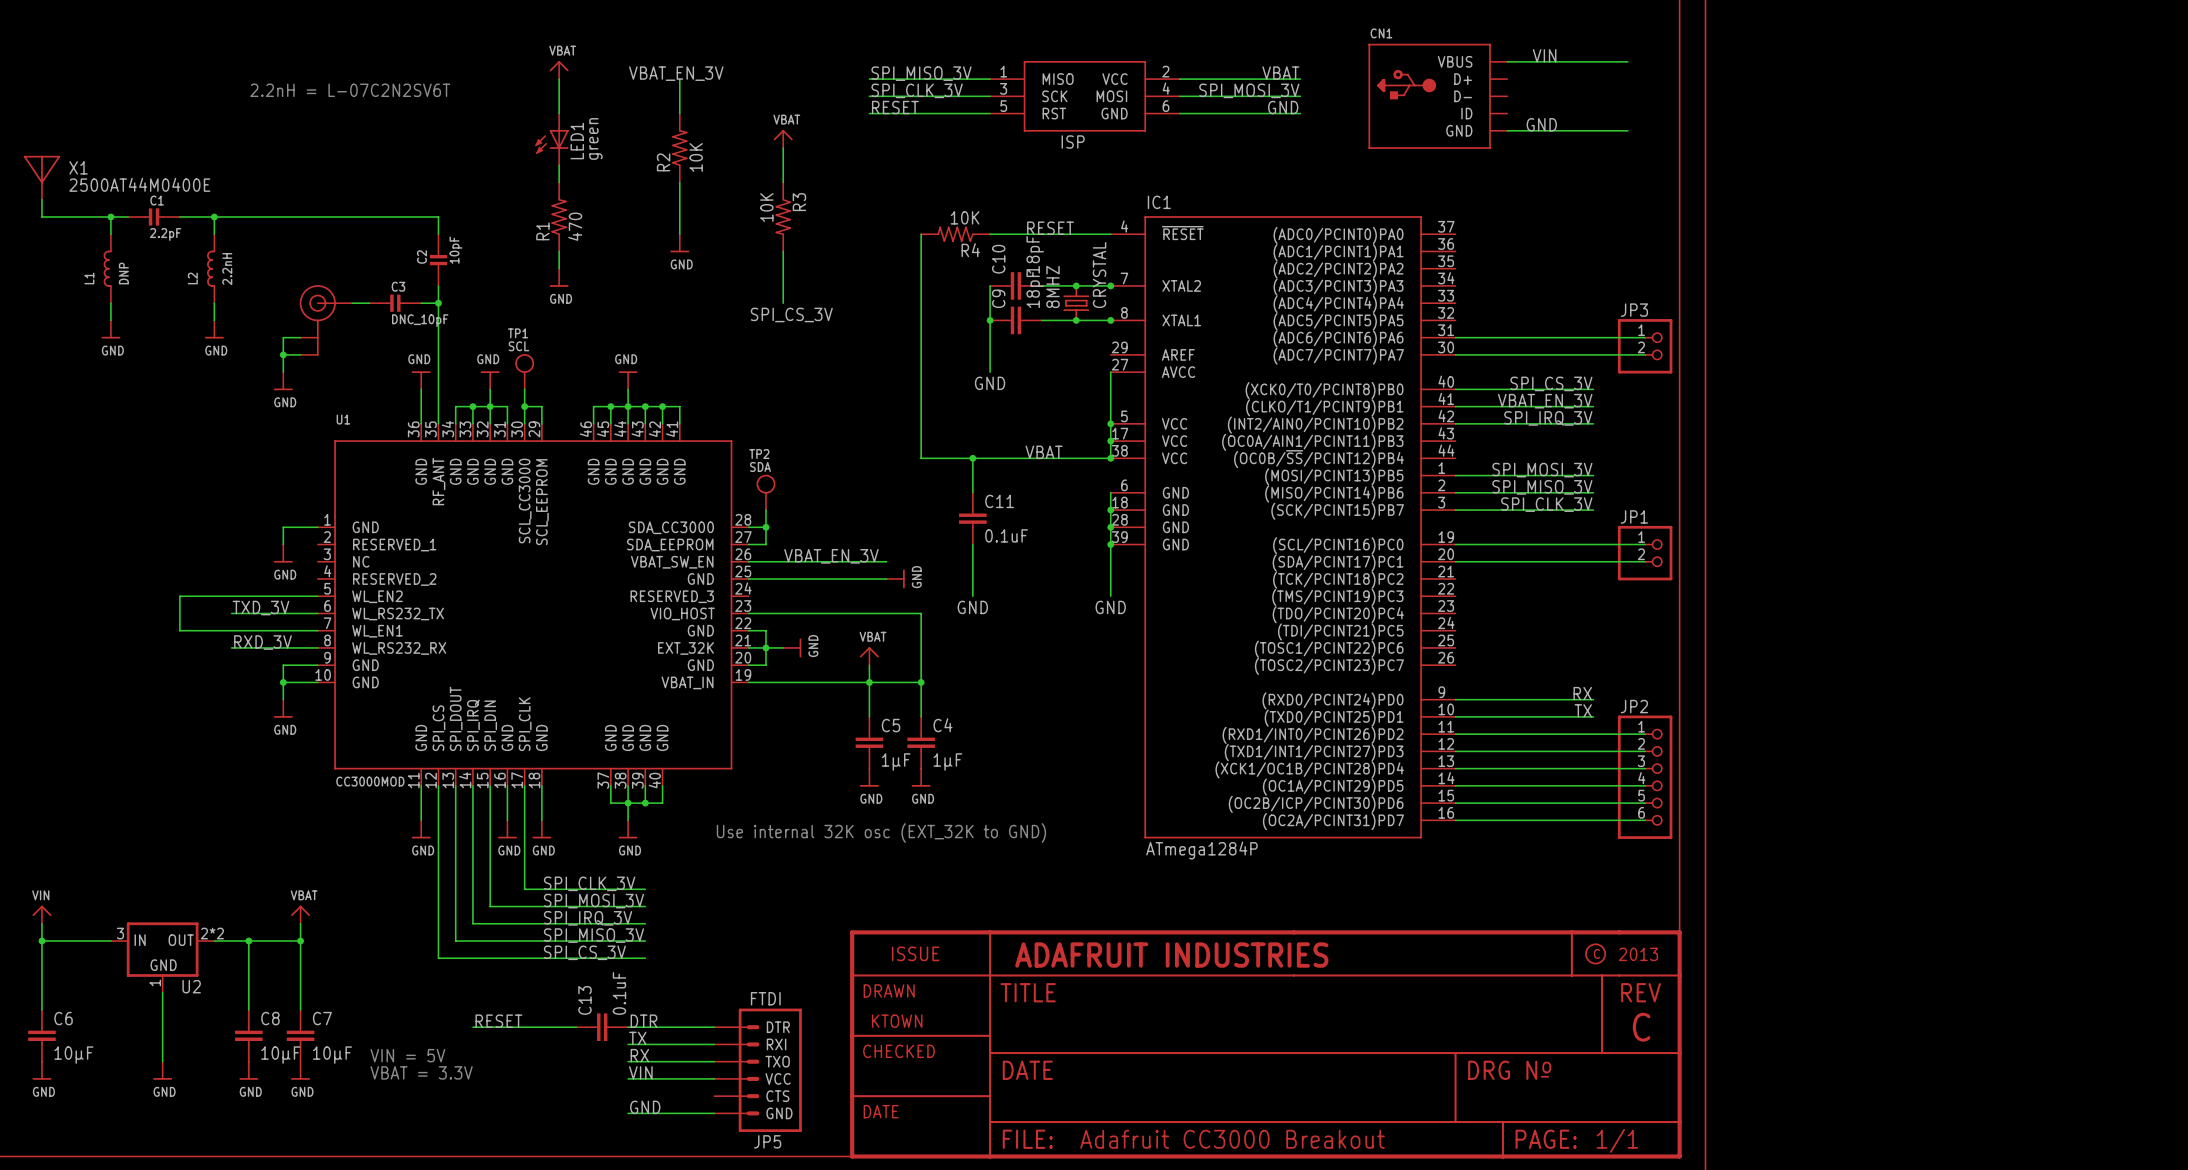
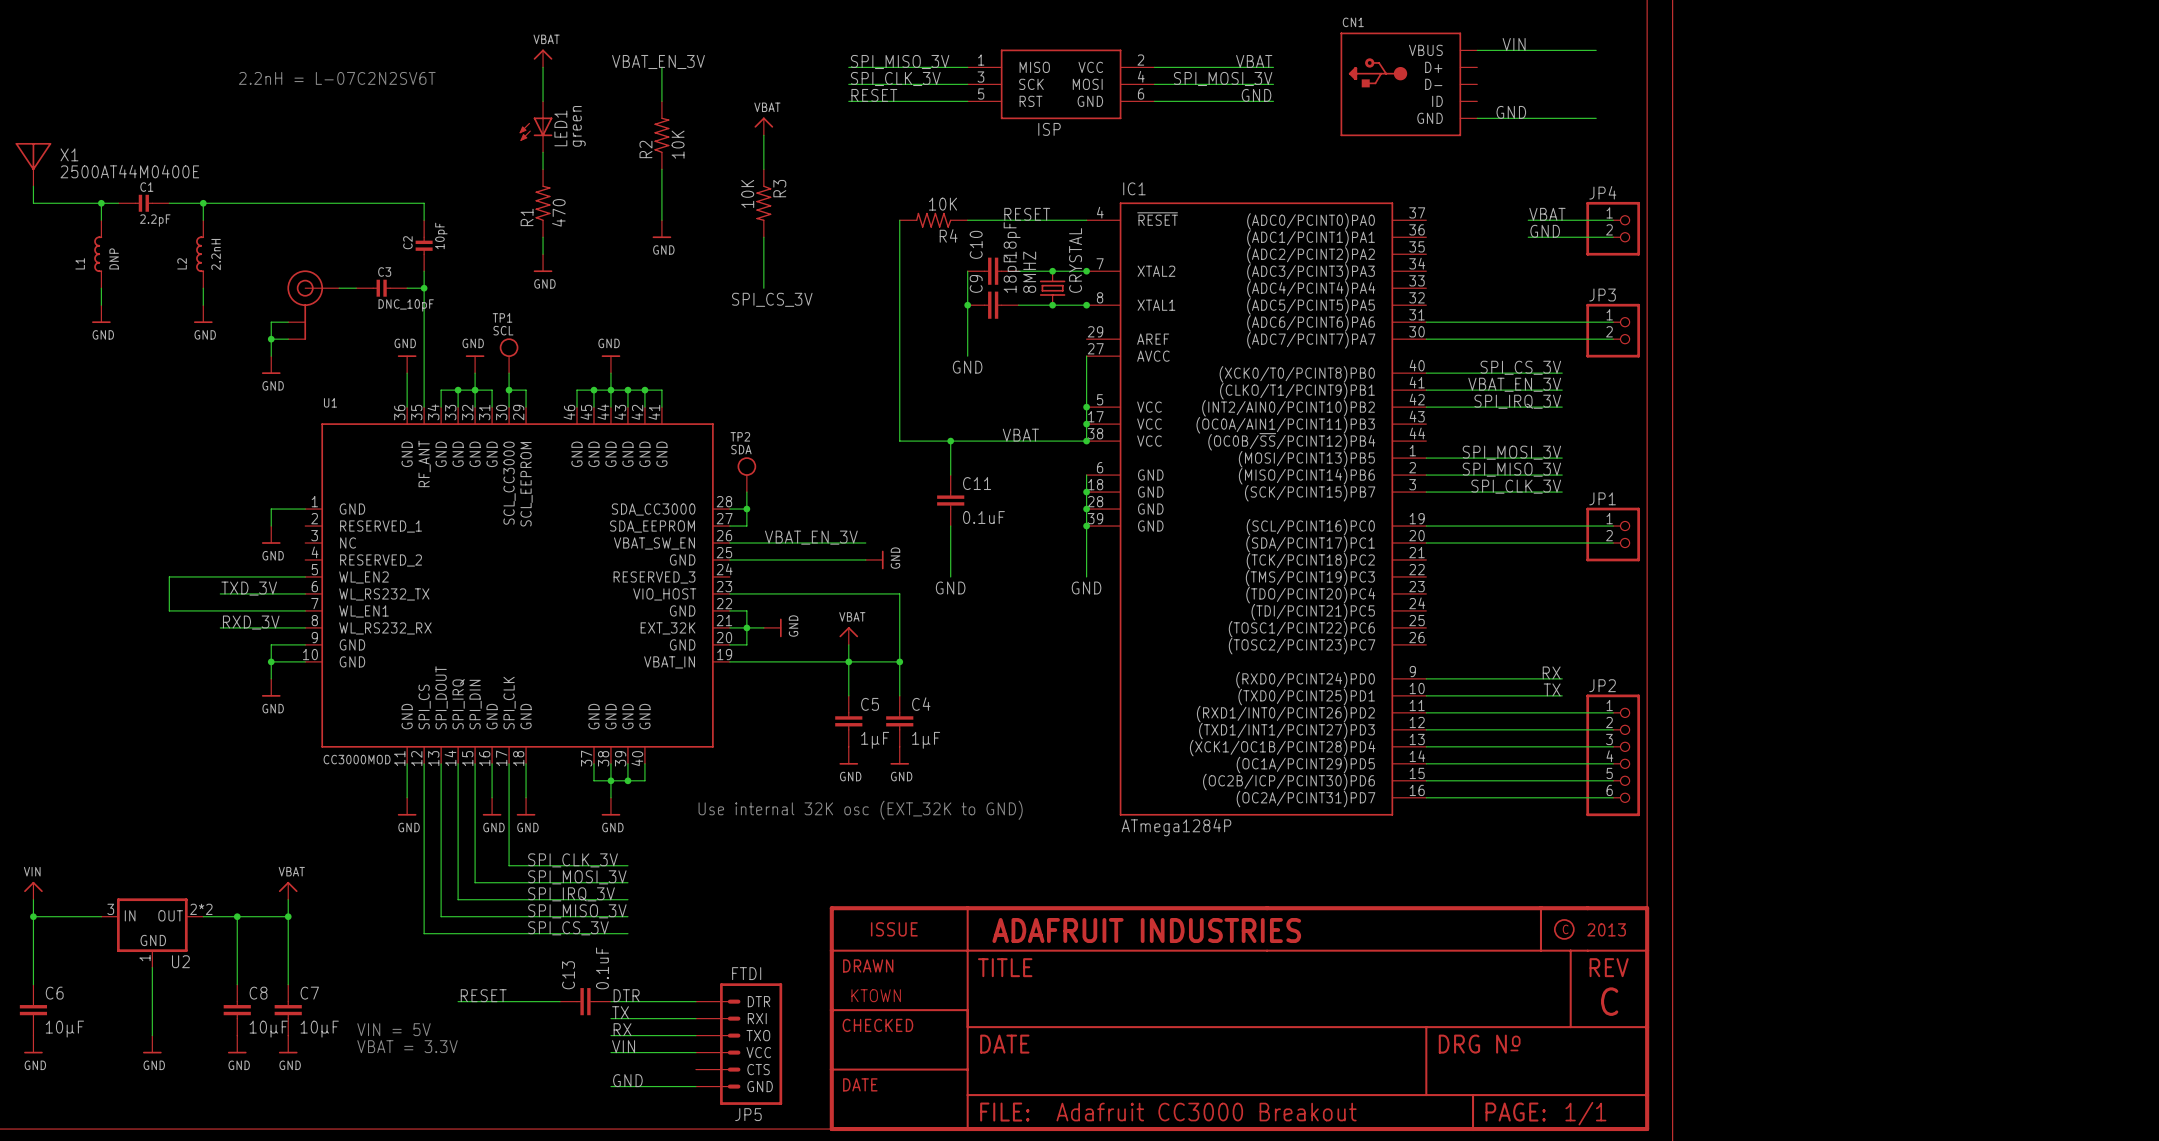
label: none -> VBAT (1547, 214)
wire: none -> (1528, 220) (1613, 220)
JP4: none -> (1613, 228)
label: none -> GND (1545, 231)
wire: none -> (1528, 237) (1613, 237)

